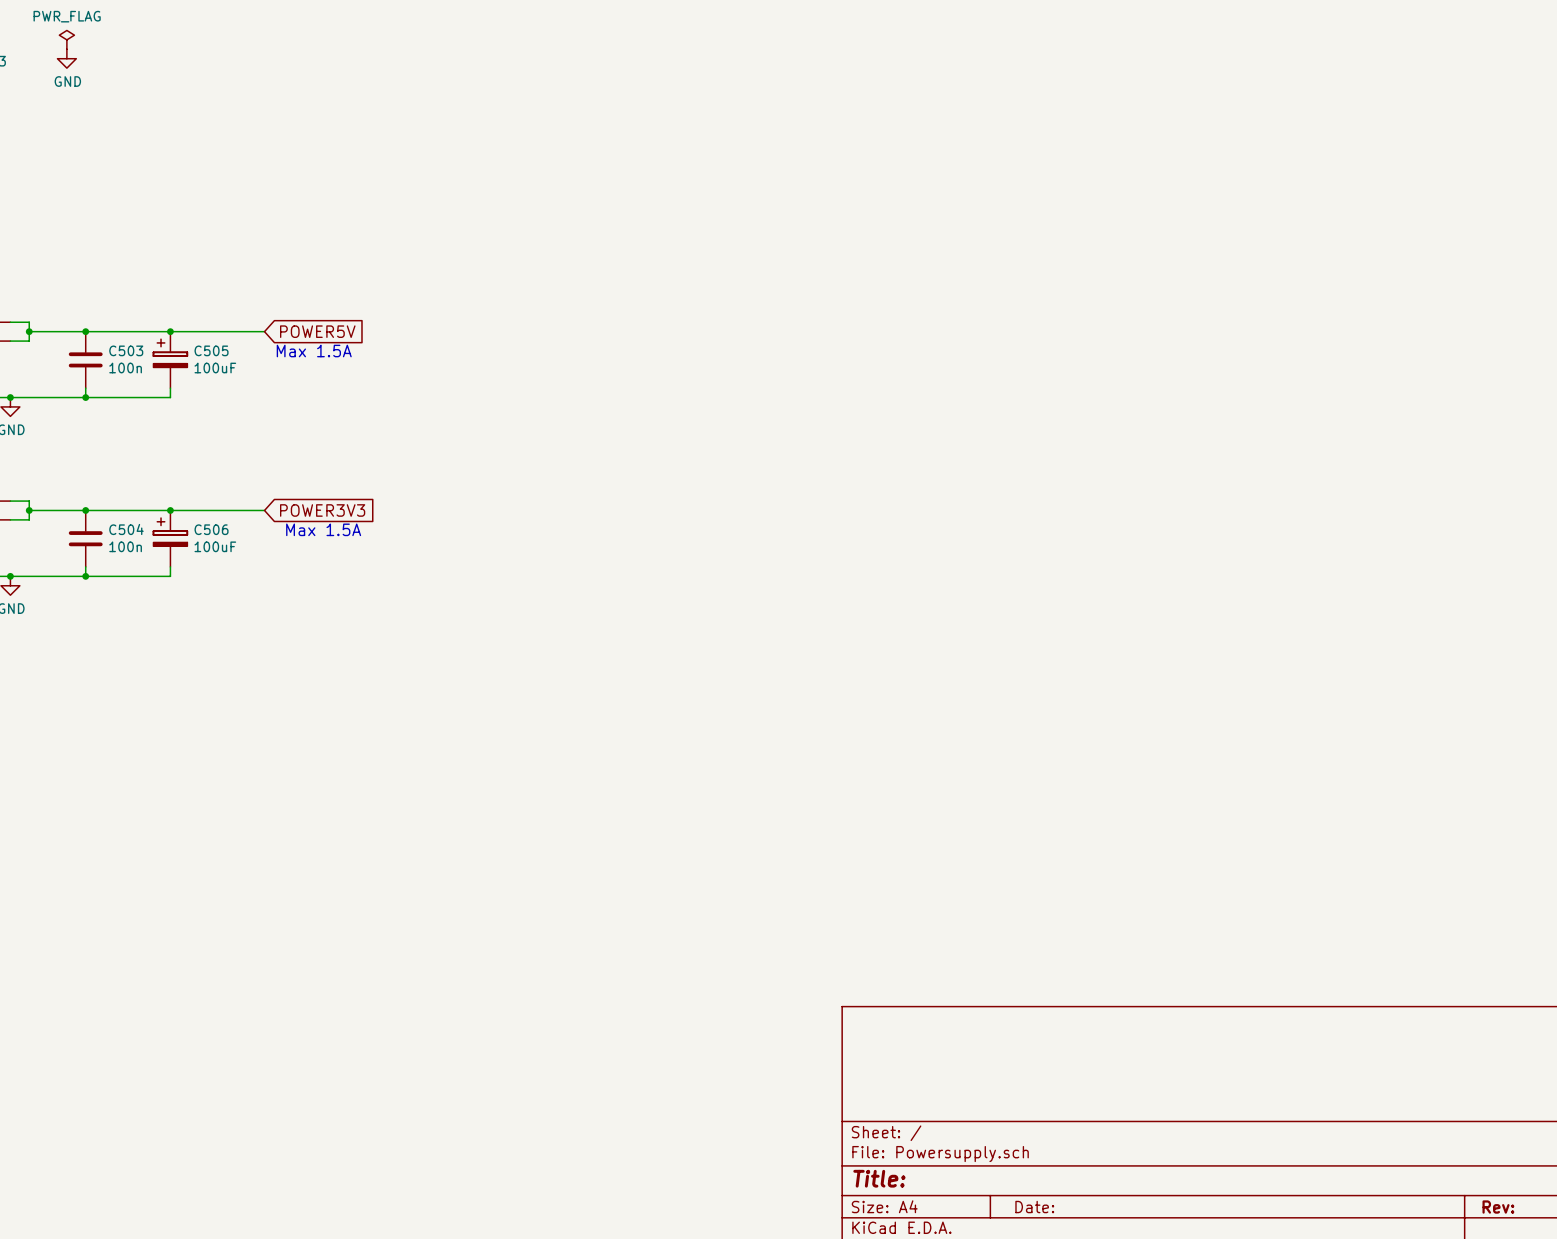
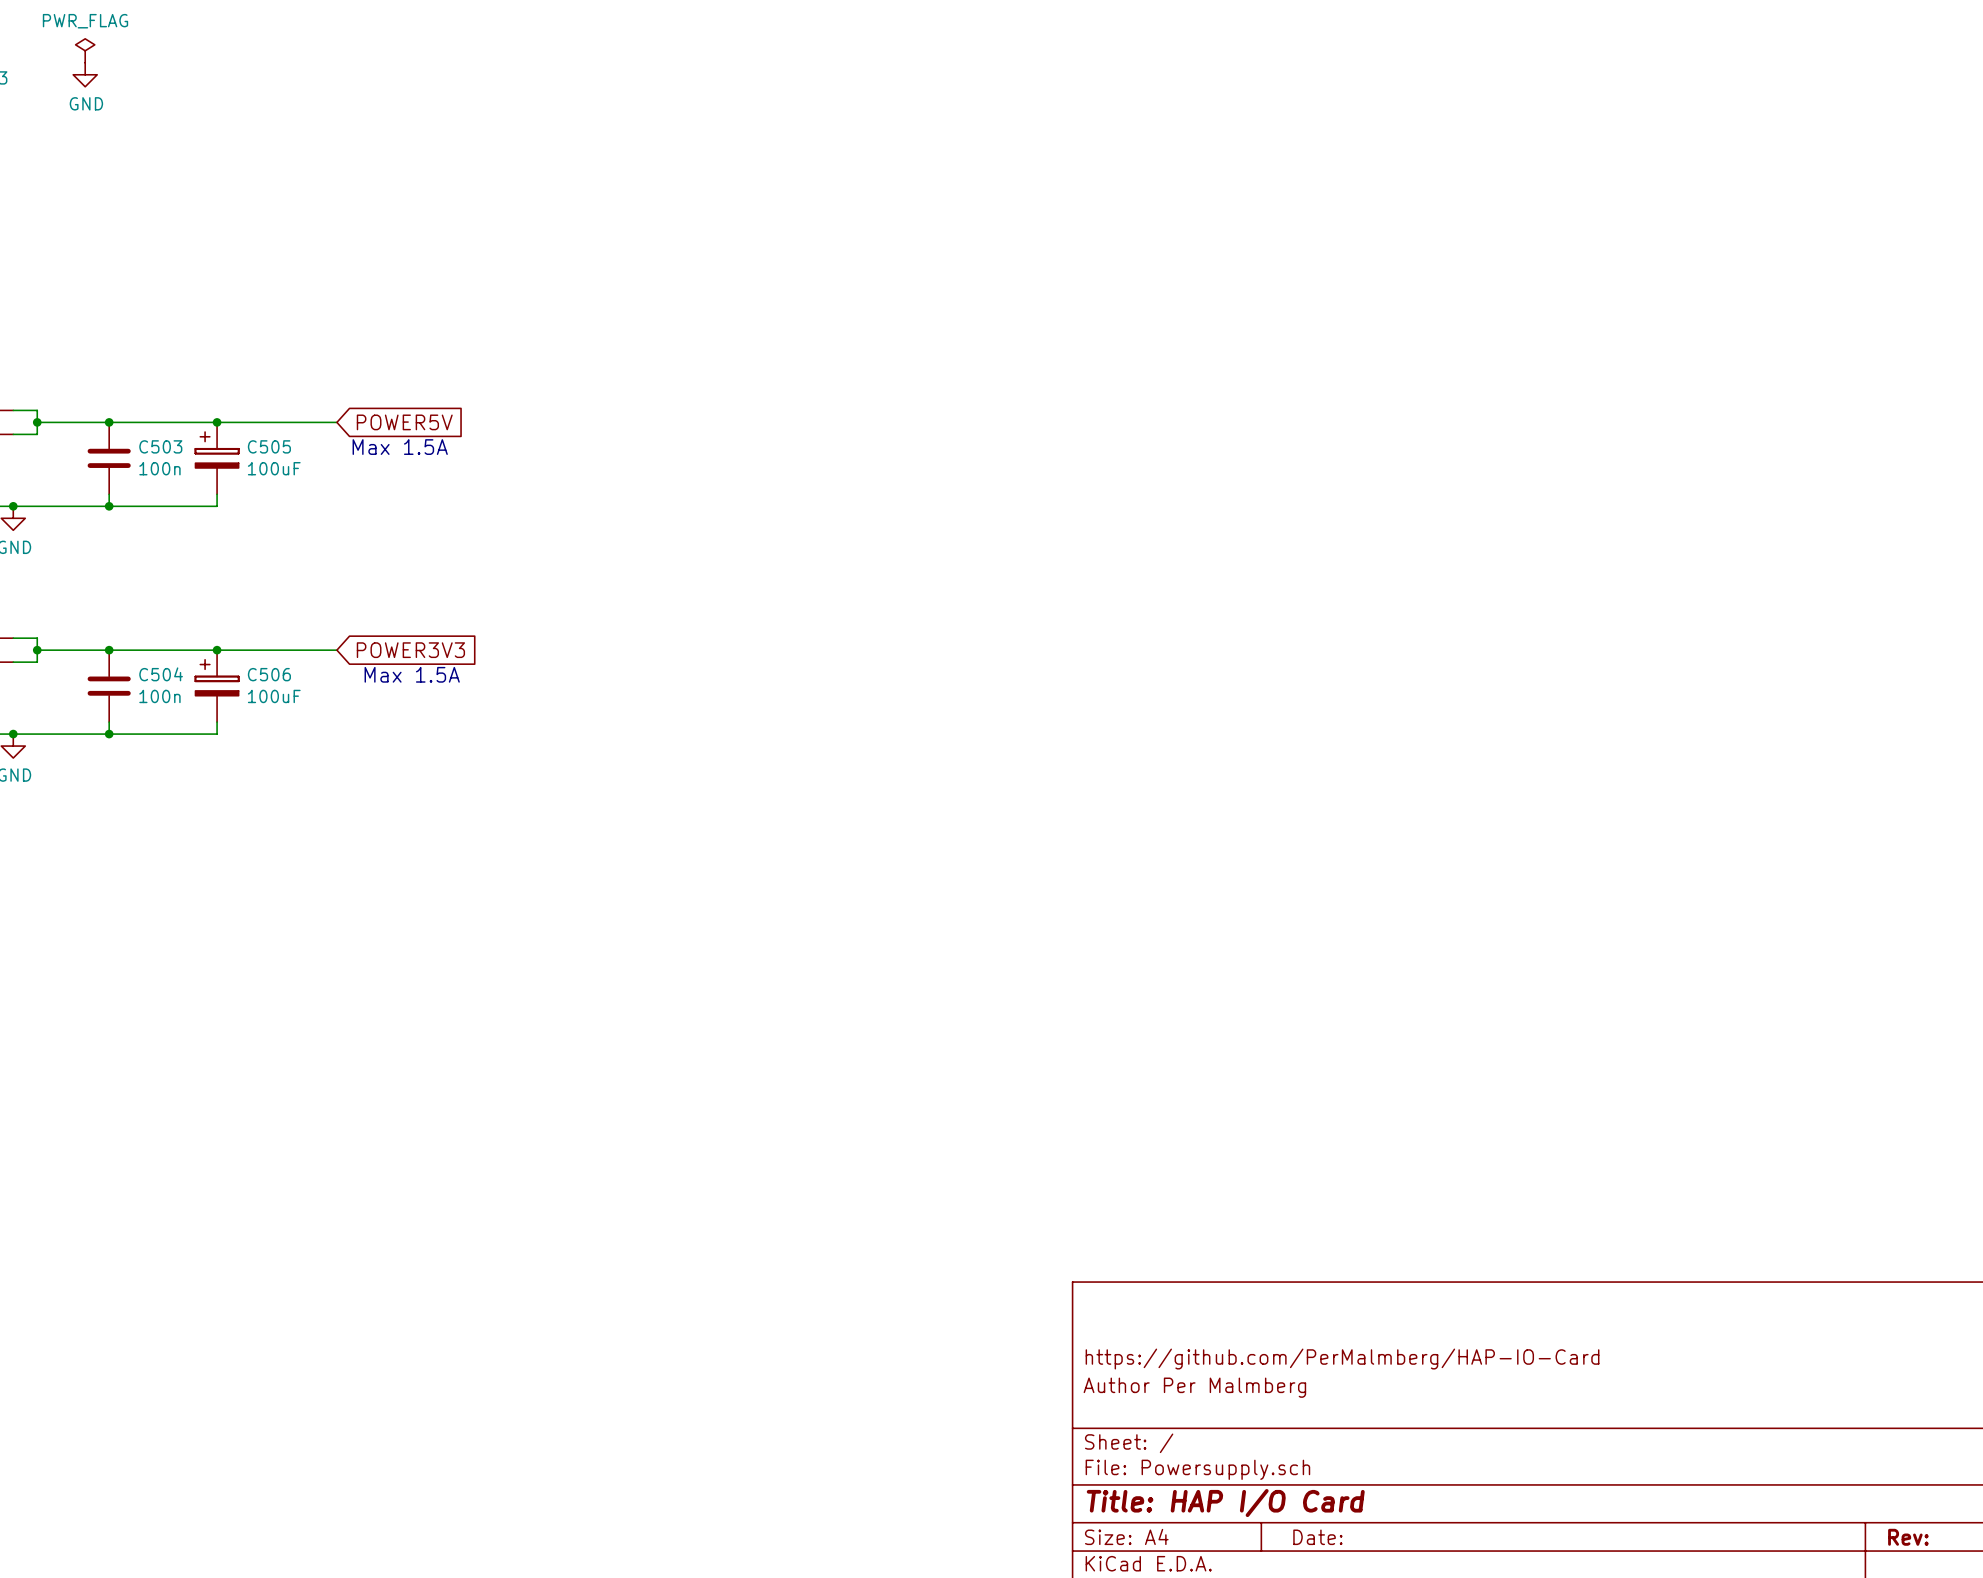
title block: none -> https://github.com/PerMalmberg/HAP-IO-Card (1342, 1359)
title block: none -> Author Per Malmberg (1194, 1387)
title block: Title: (879, 1178) -> Title: HAP I/O Card (1225, 1503)

